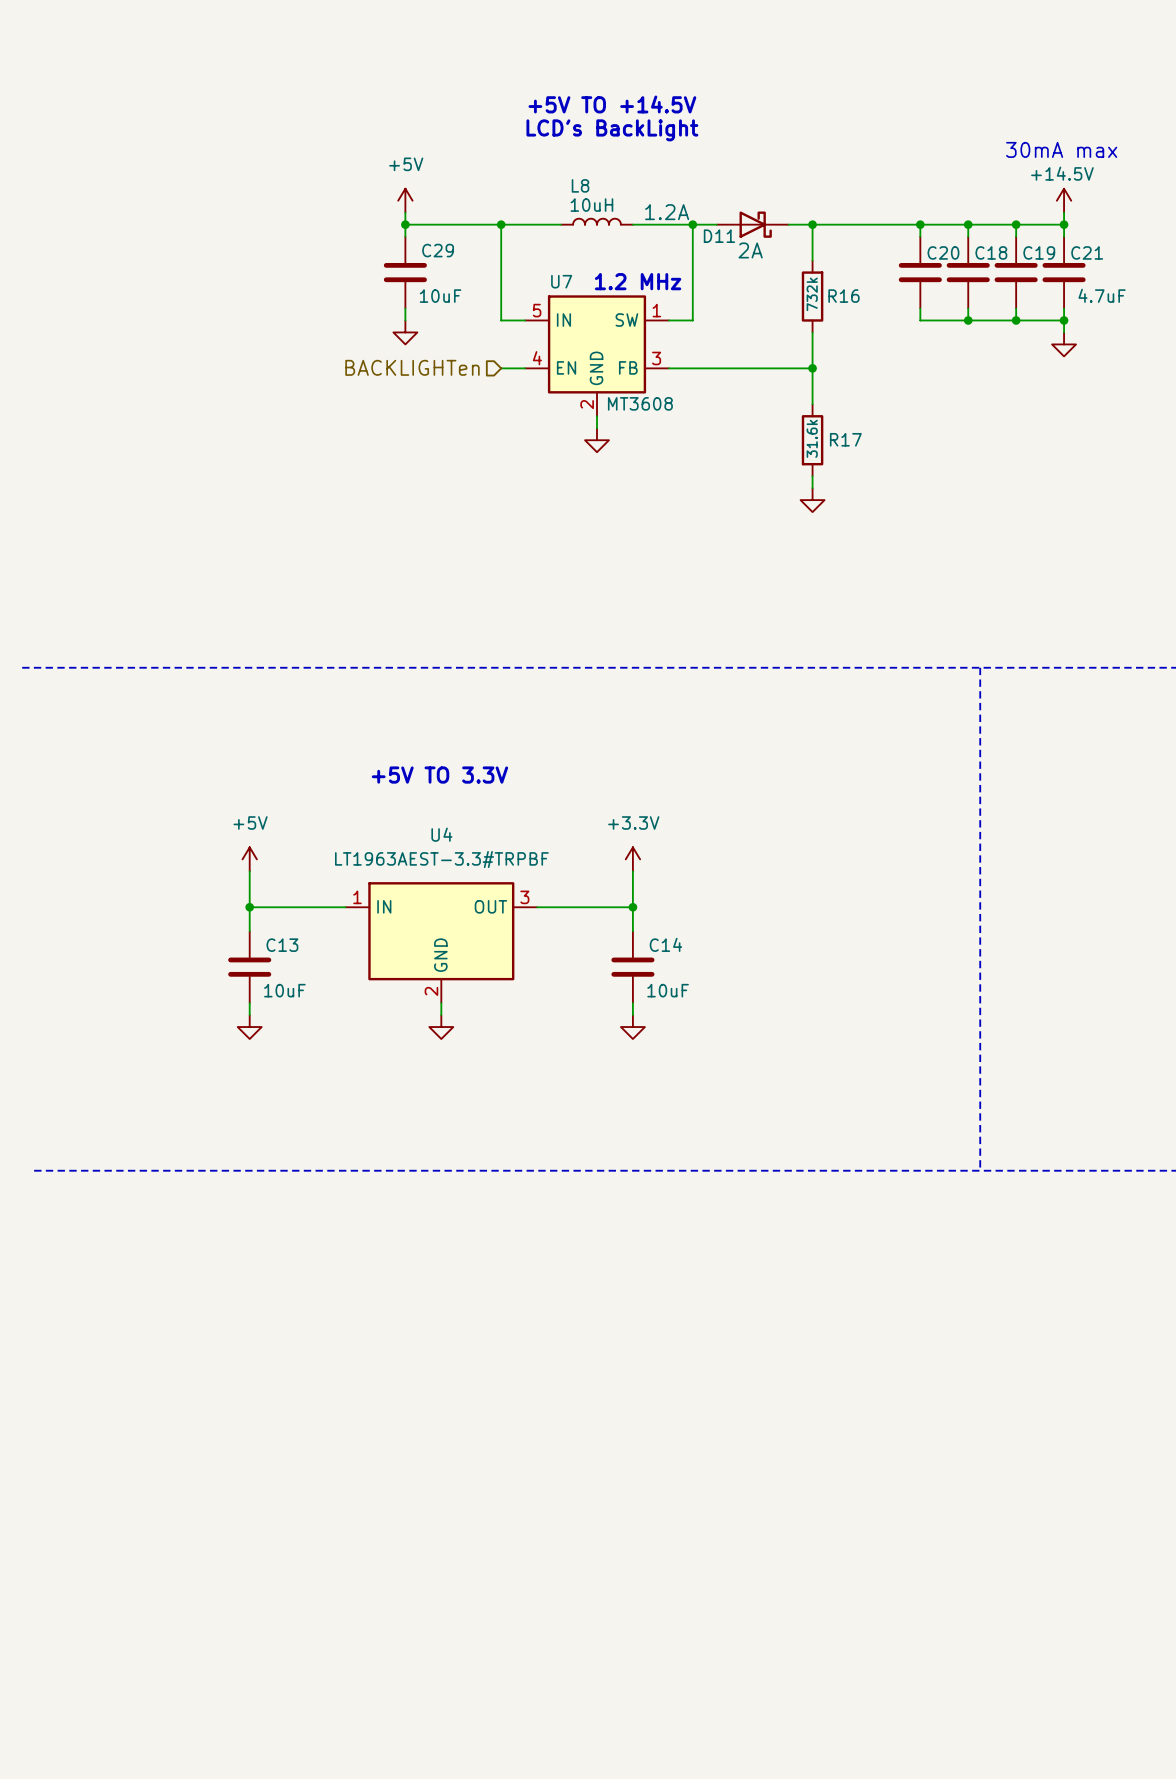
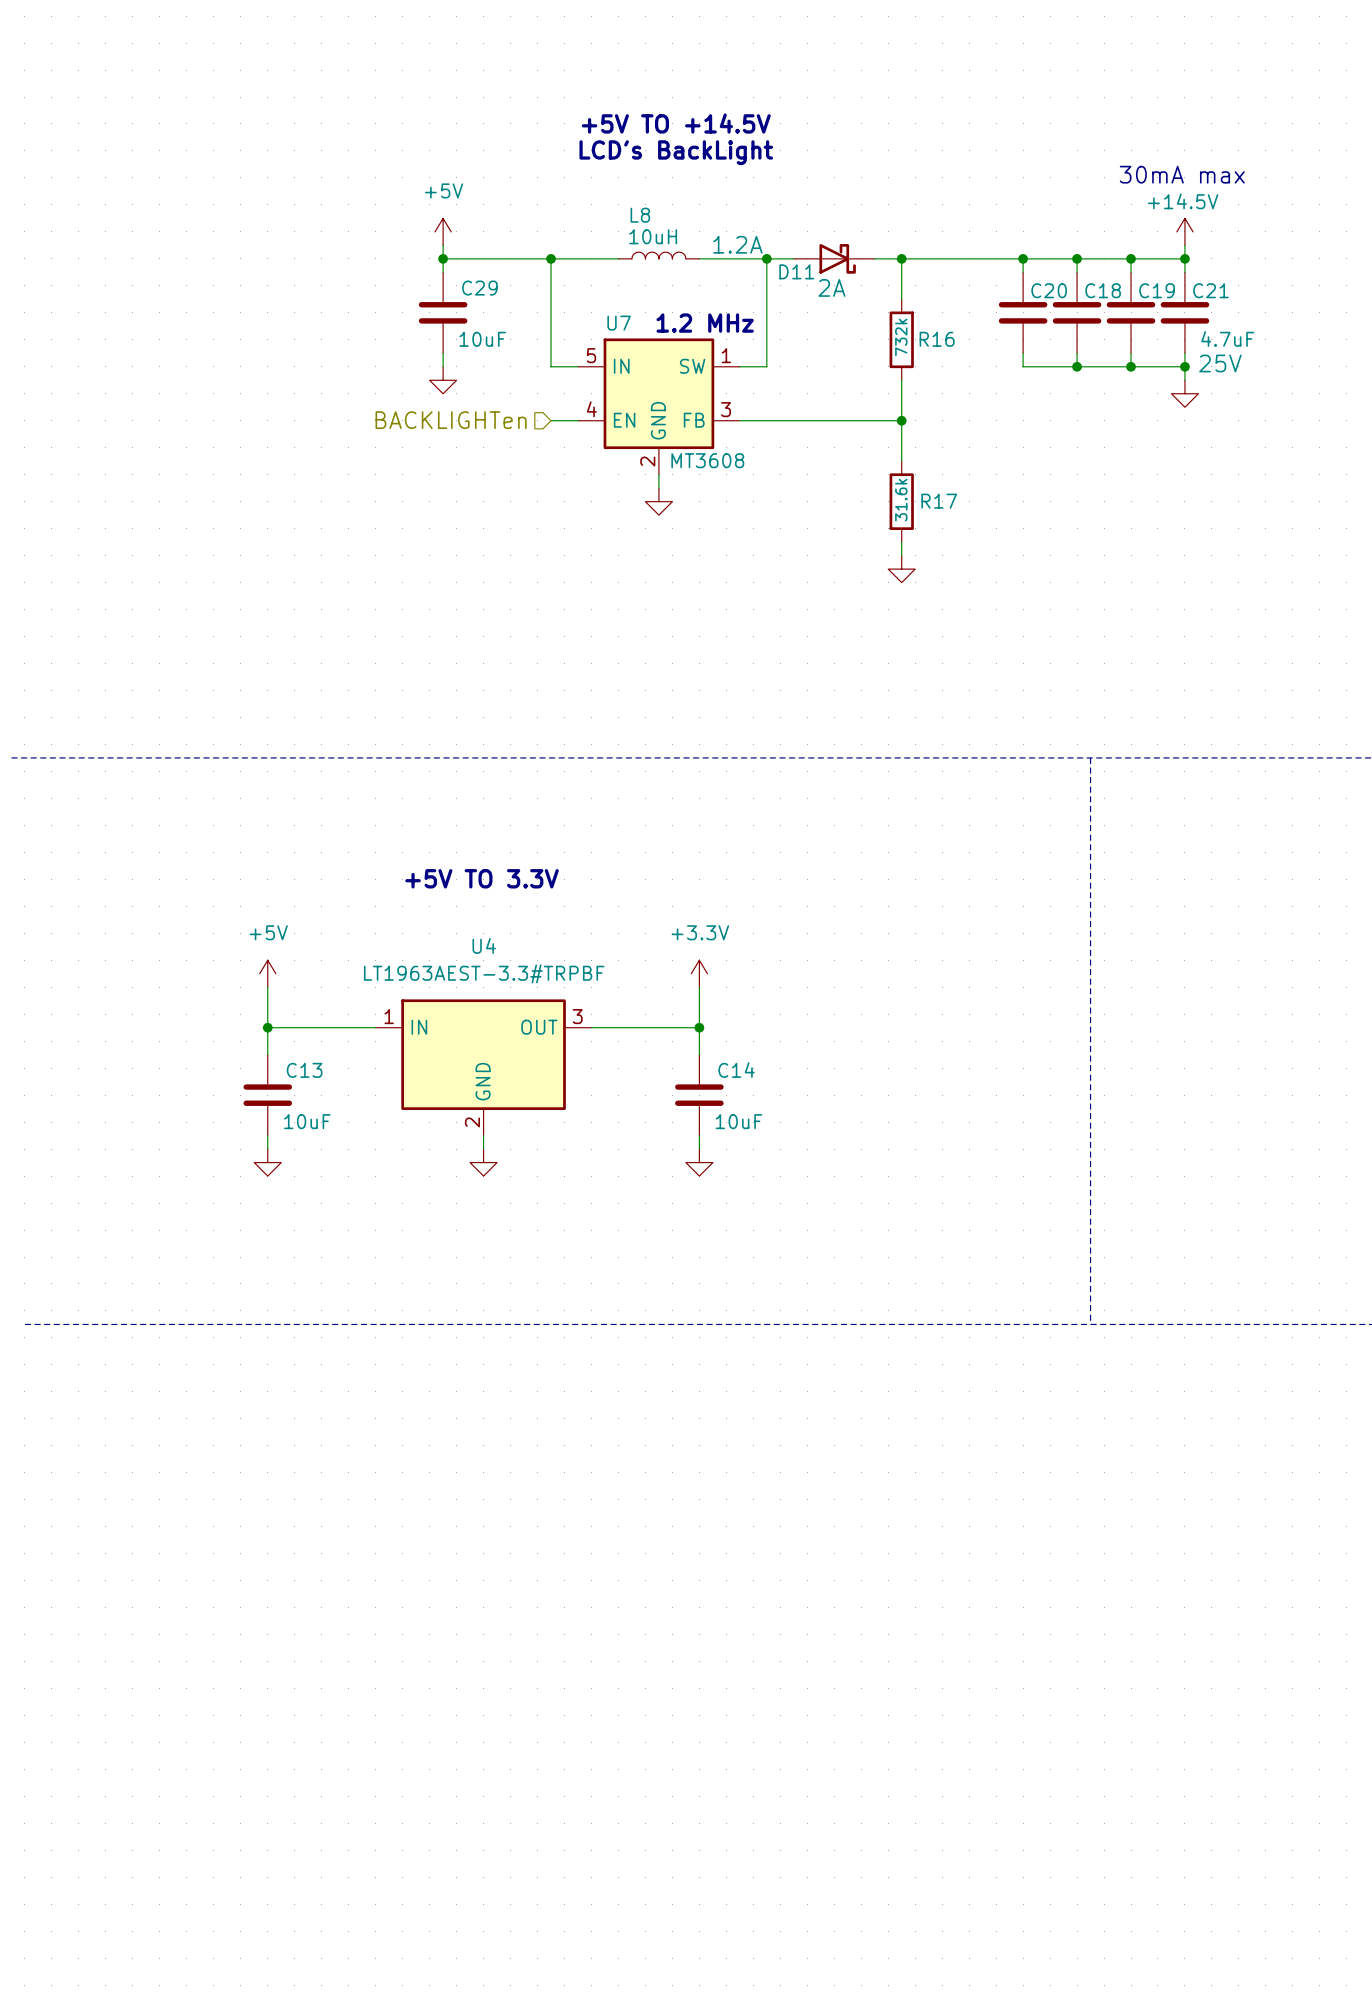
C21 text: none -> 25V (1220, 363)

